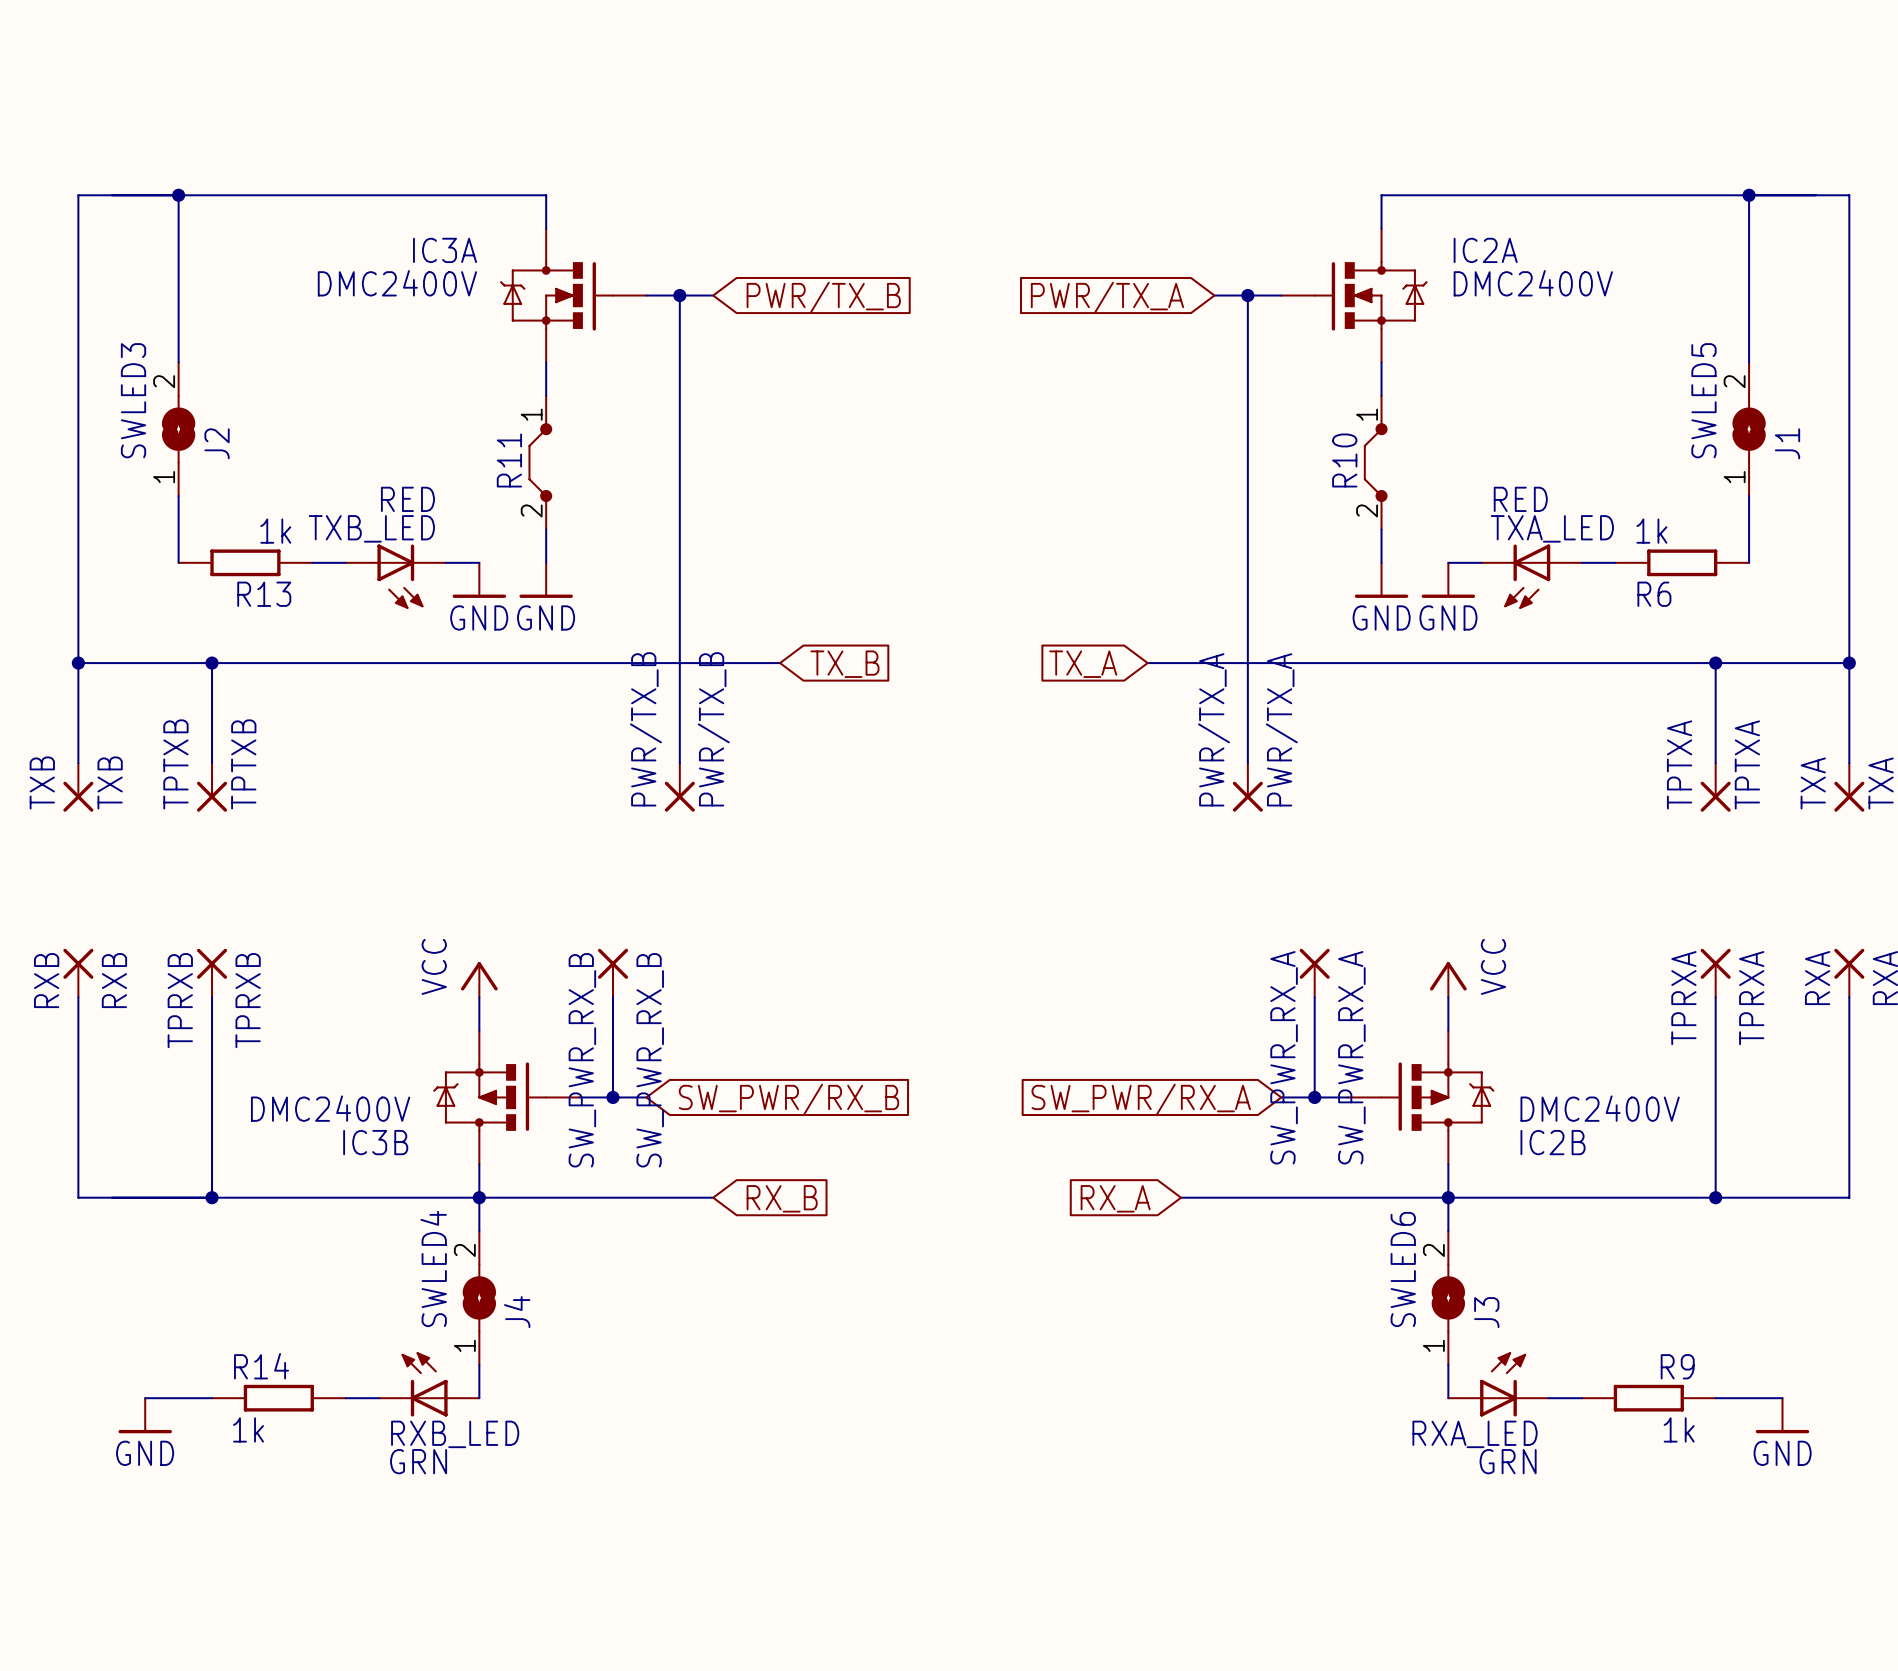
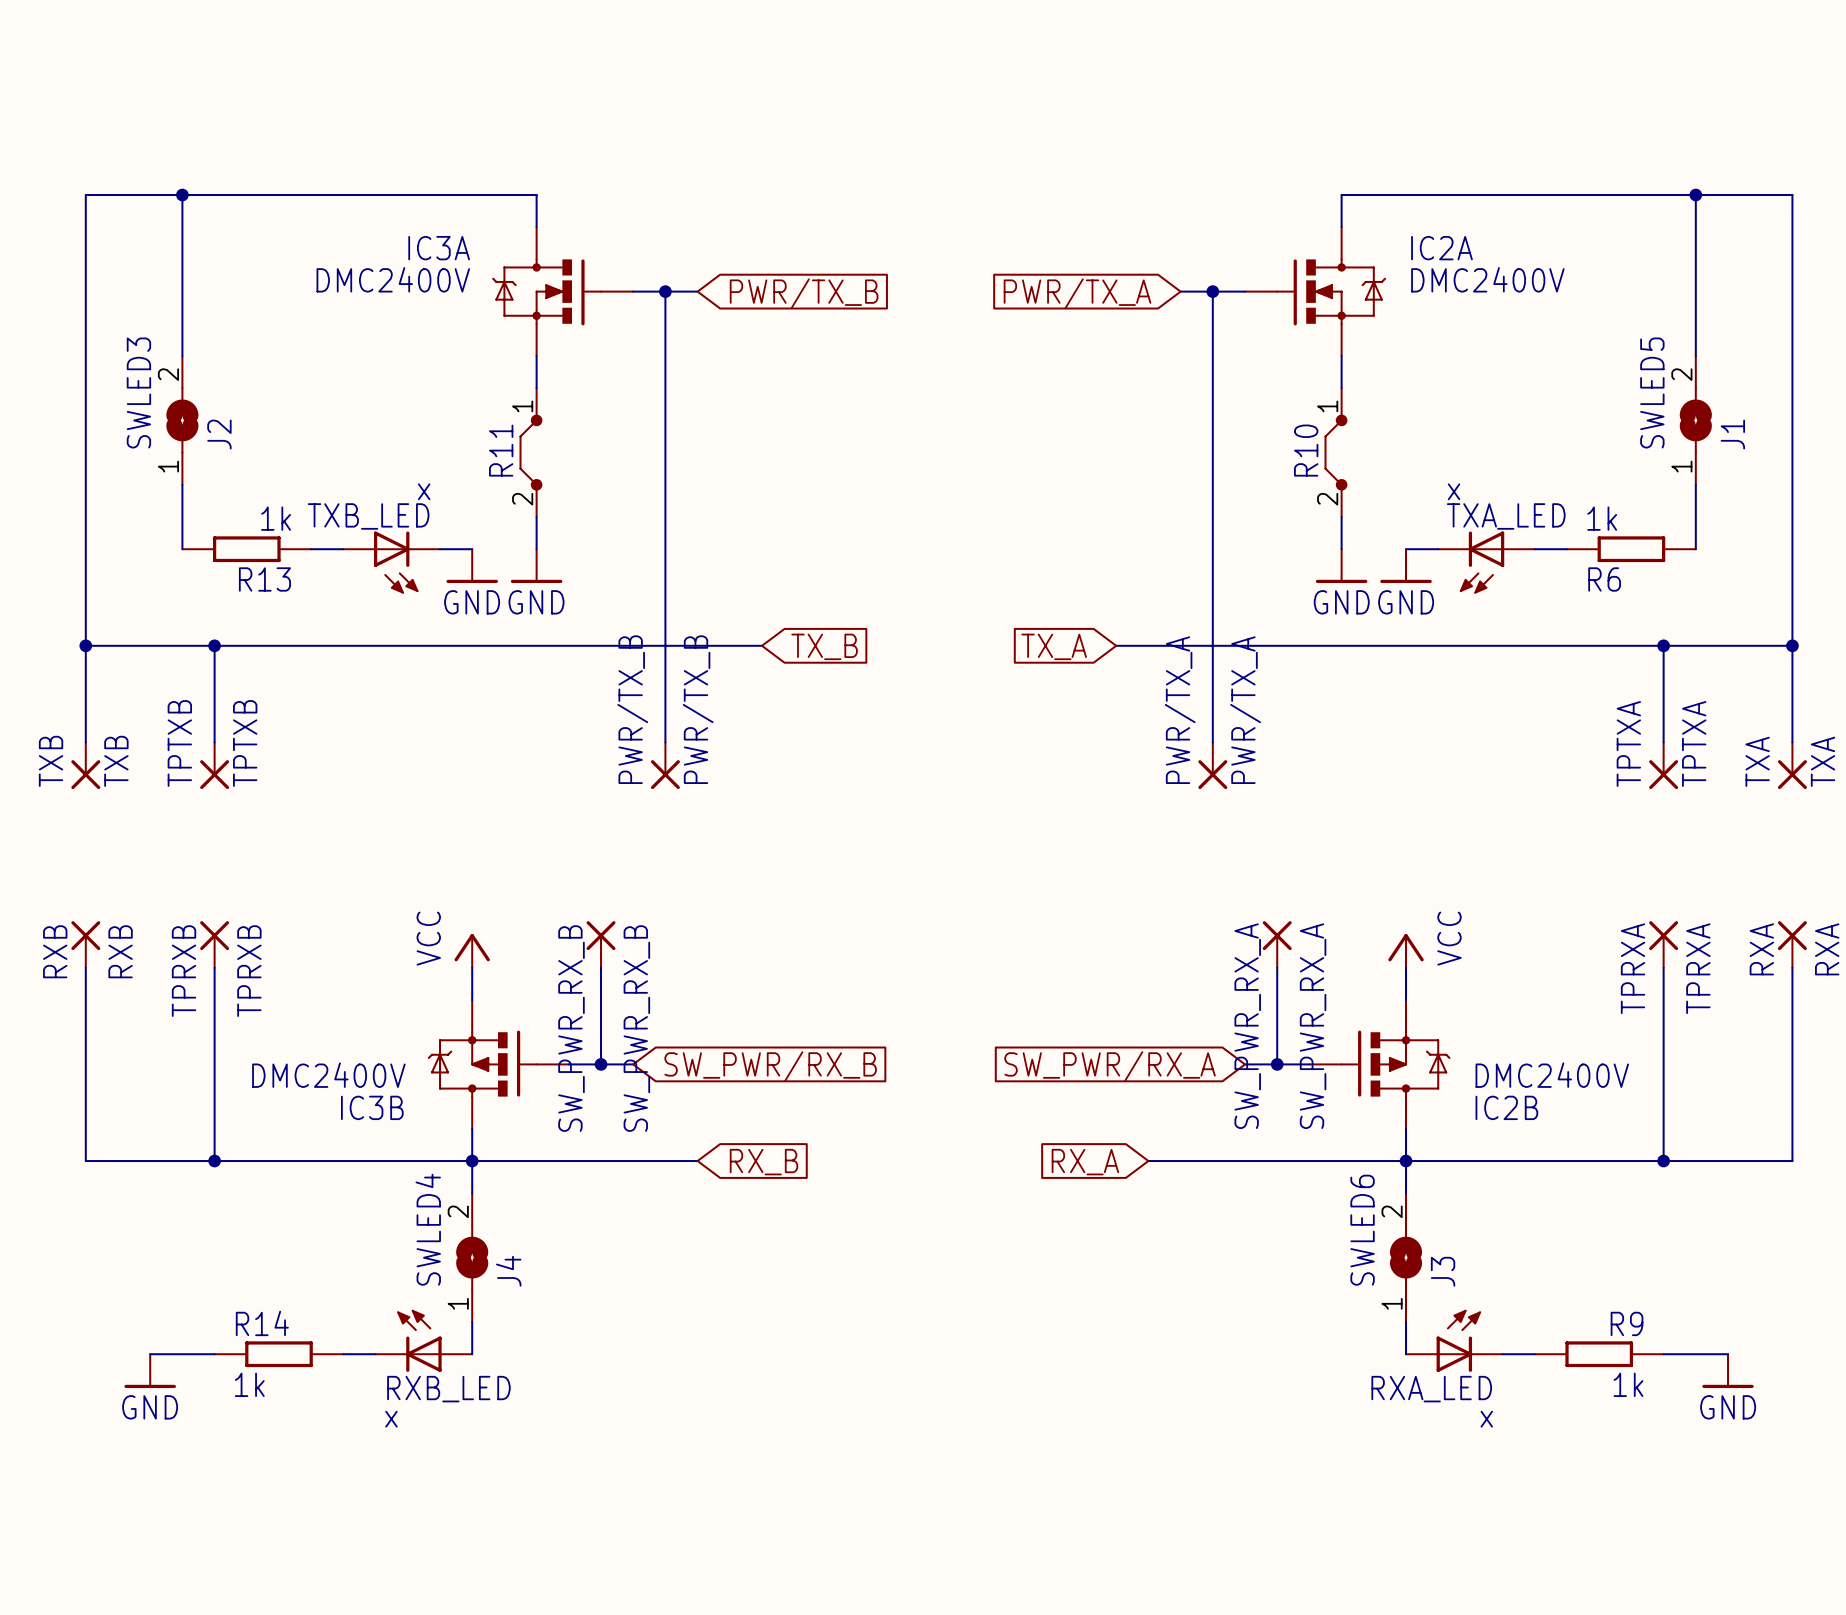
TXB_LED value: RED (407, 499) -> x (424, 491)
TXA_LED value: RED (1520, 499) -> x (1454, 491)
RXB_LED value: GRN (418, 1461) -> x (391, 1419)
RXA_LED value: GRN (1508, 1461) -> x (1486, 1419)

